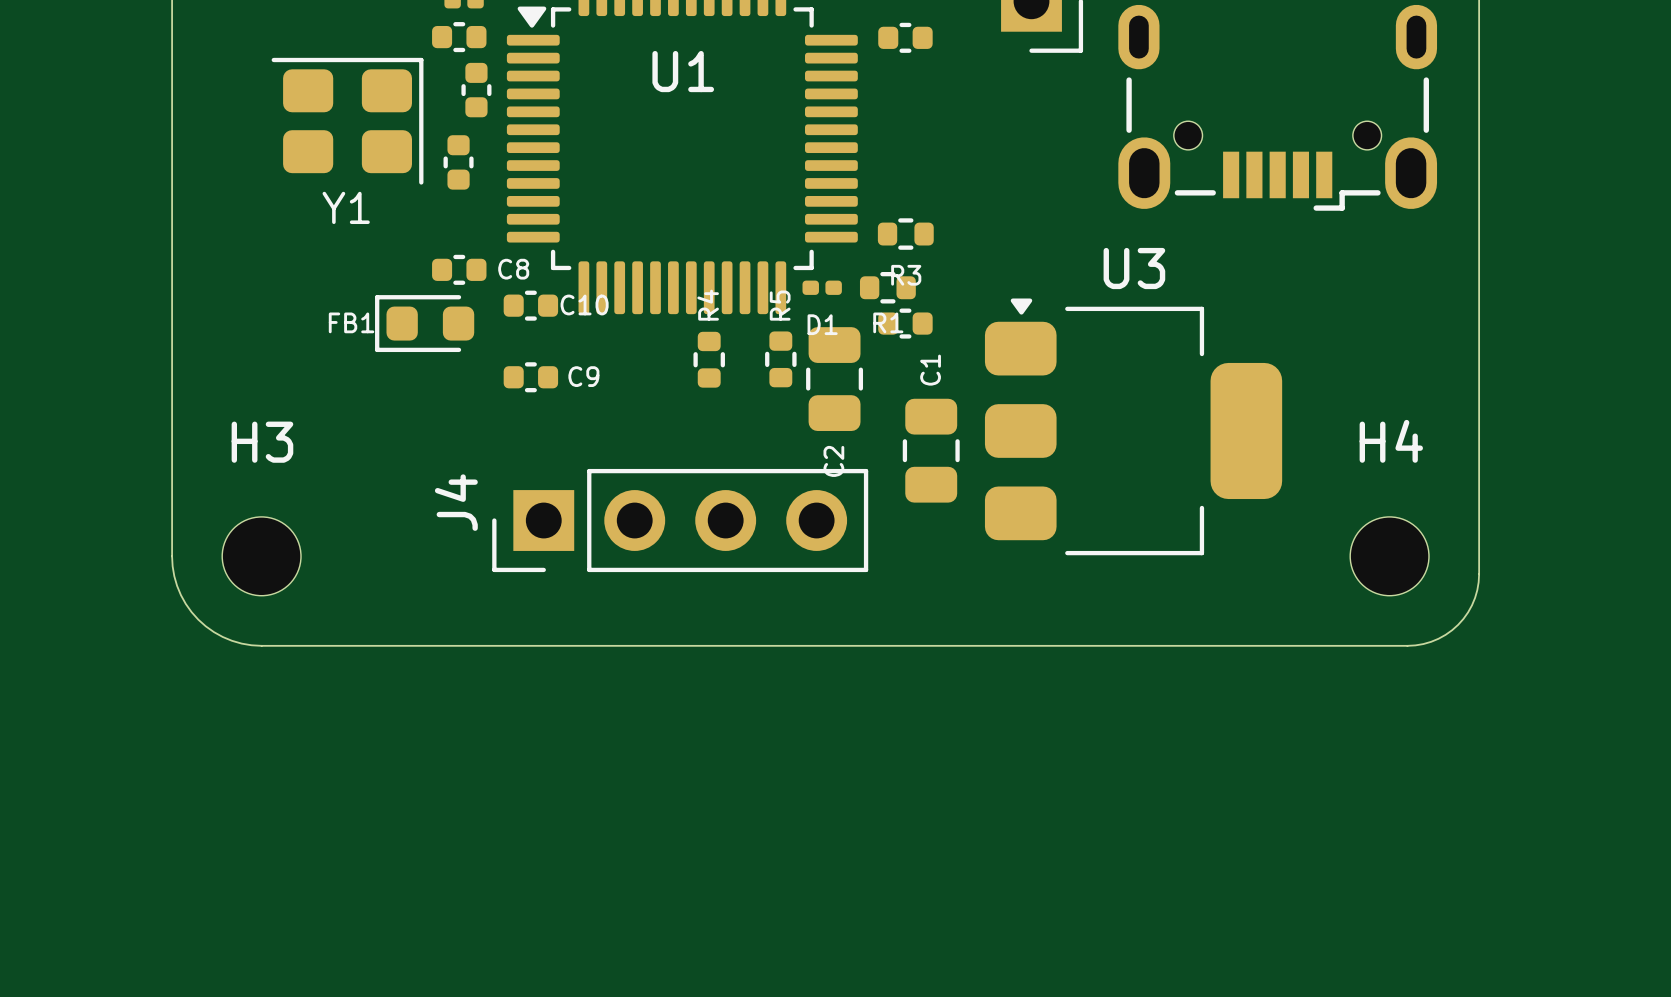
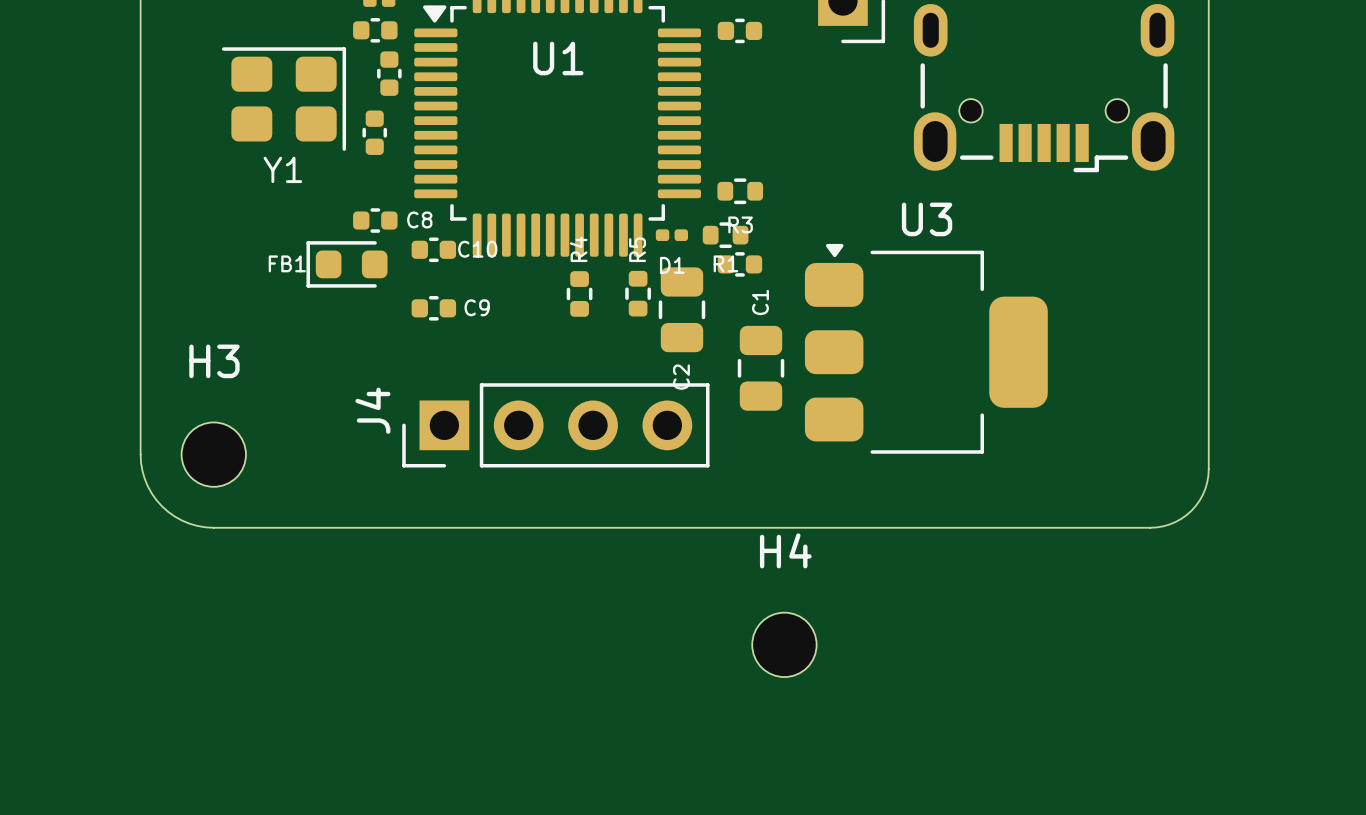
H4 position: (1389, 556) -> (784, 644)

